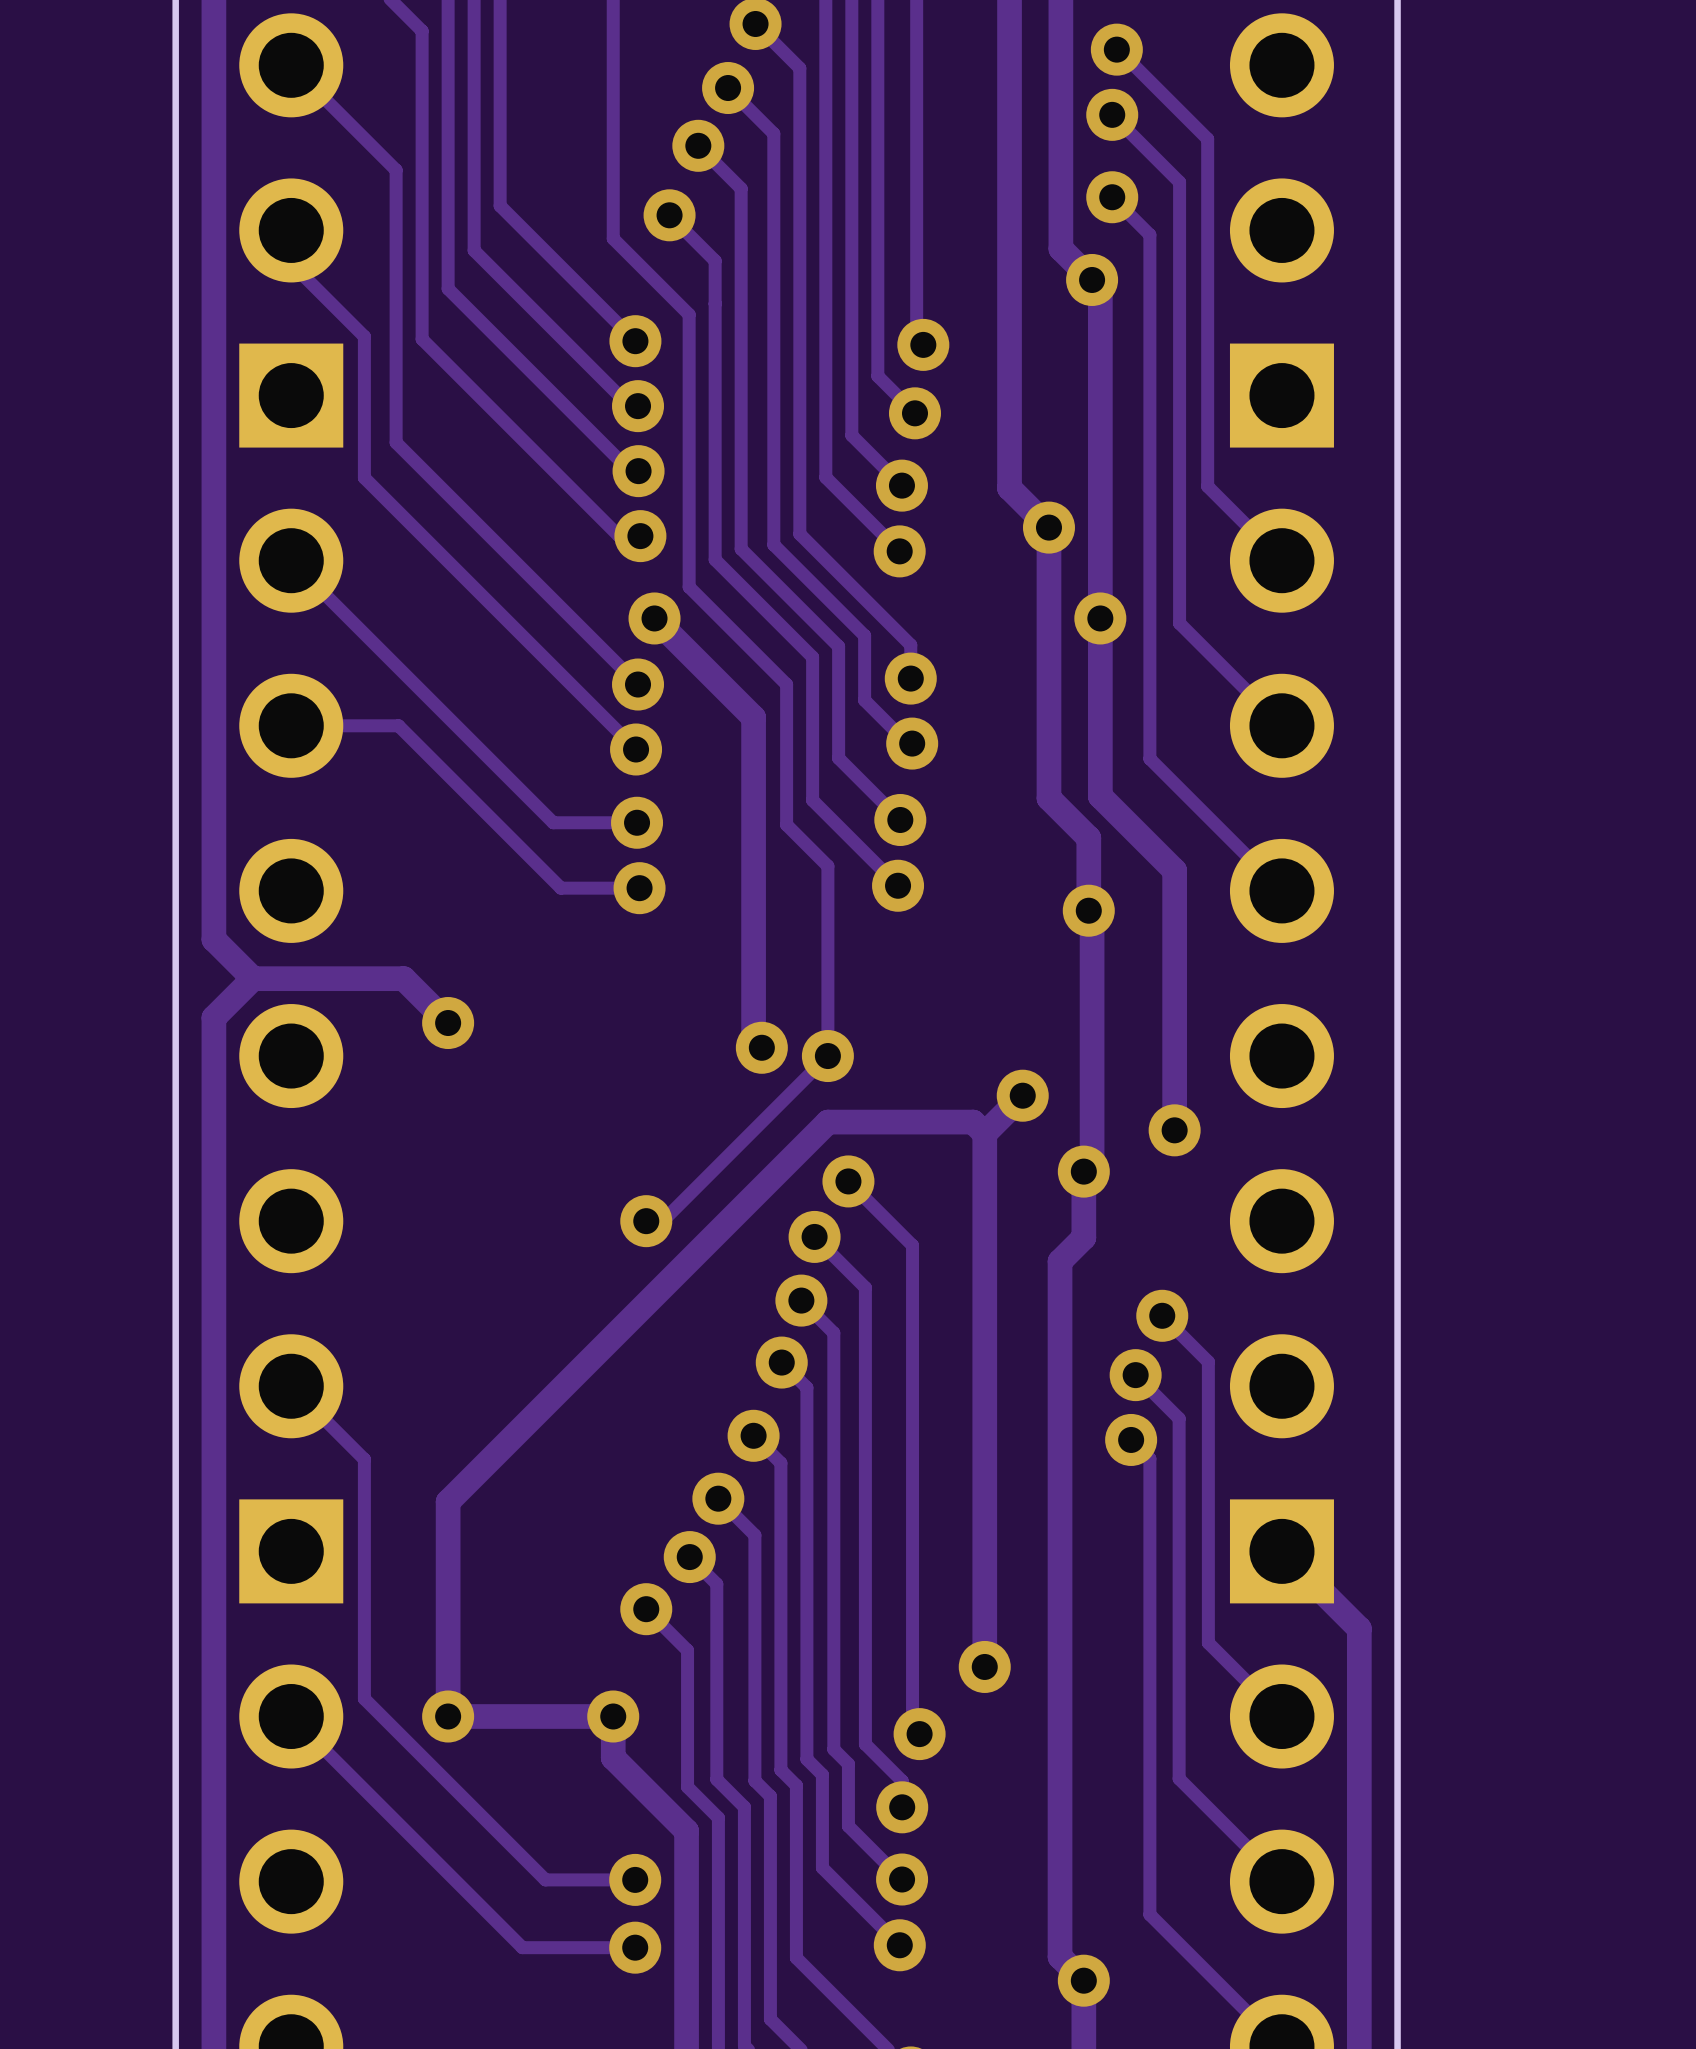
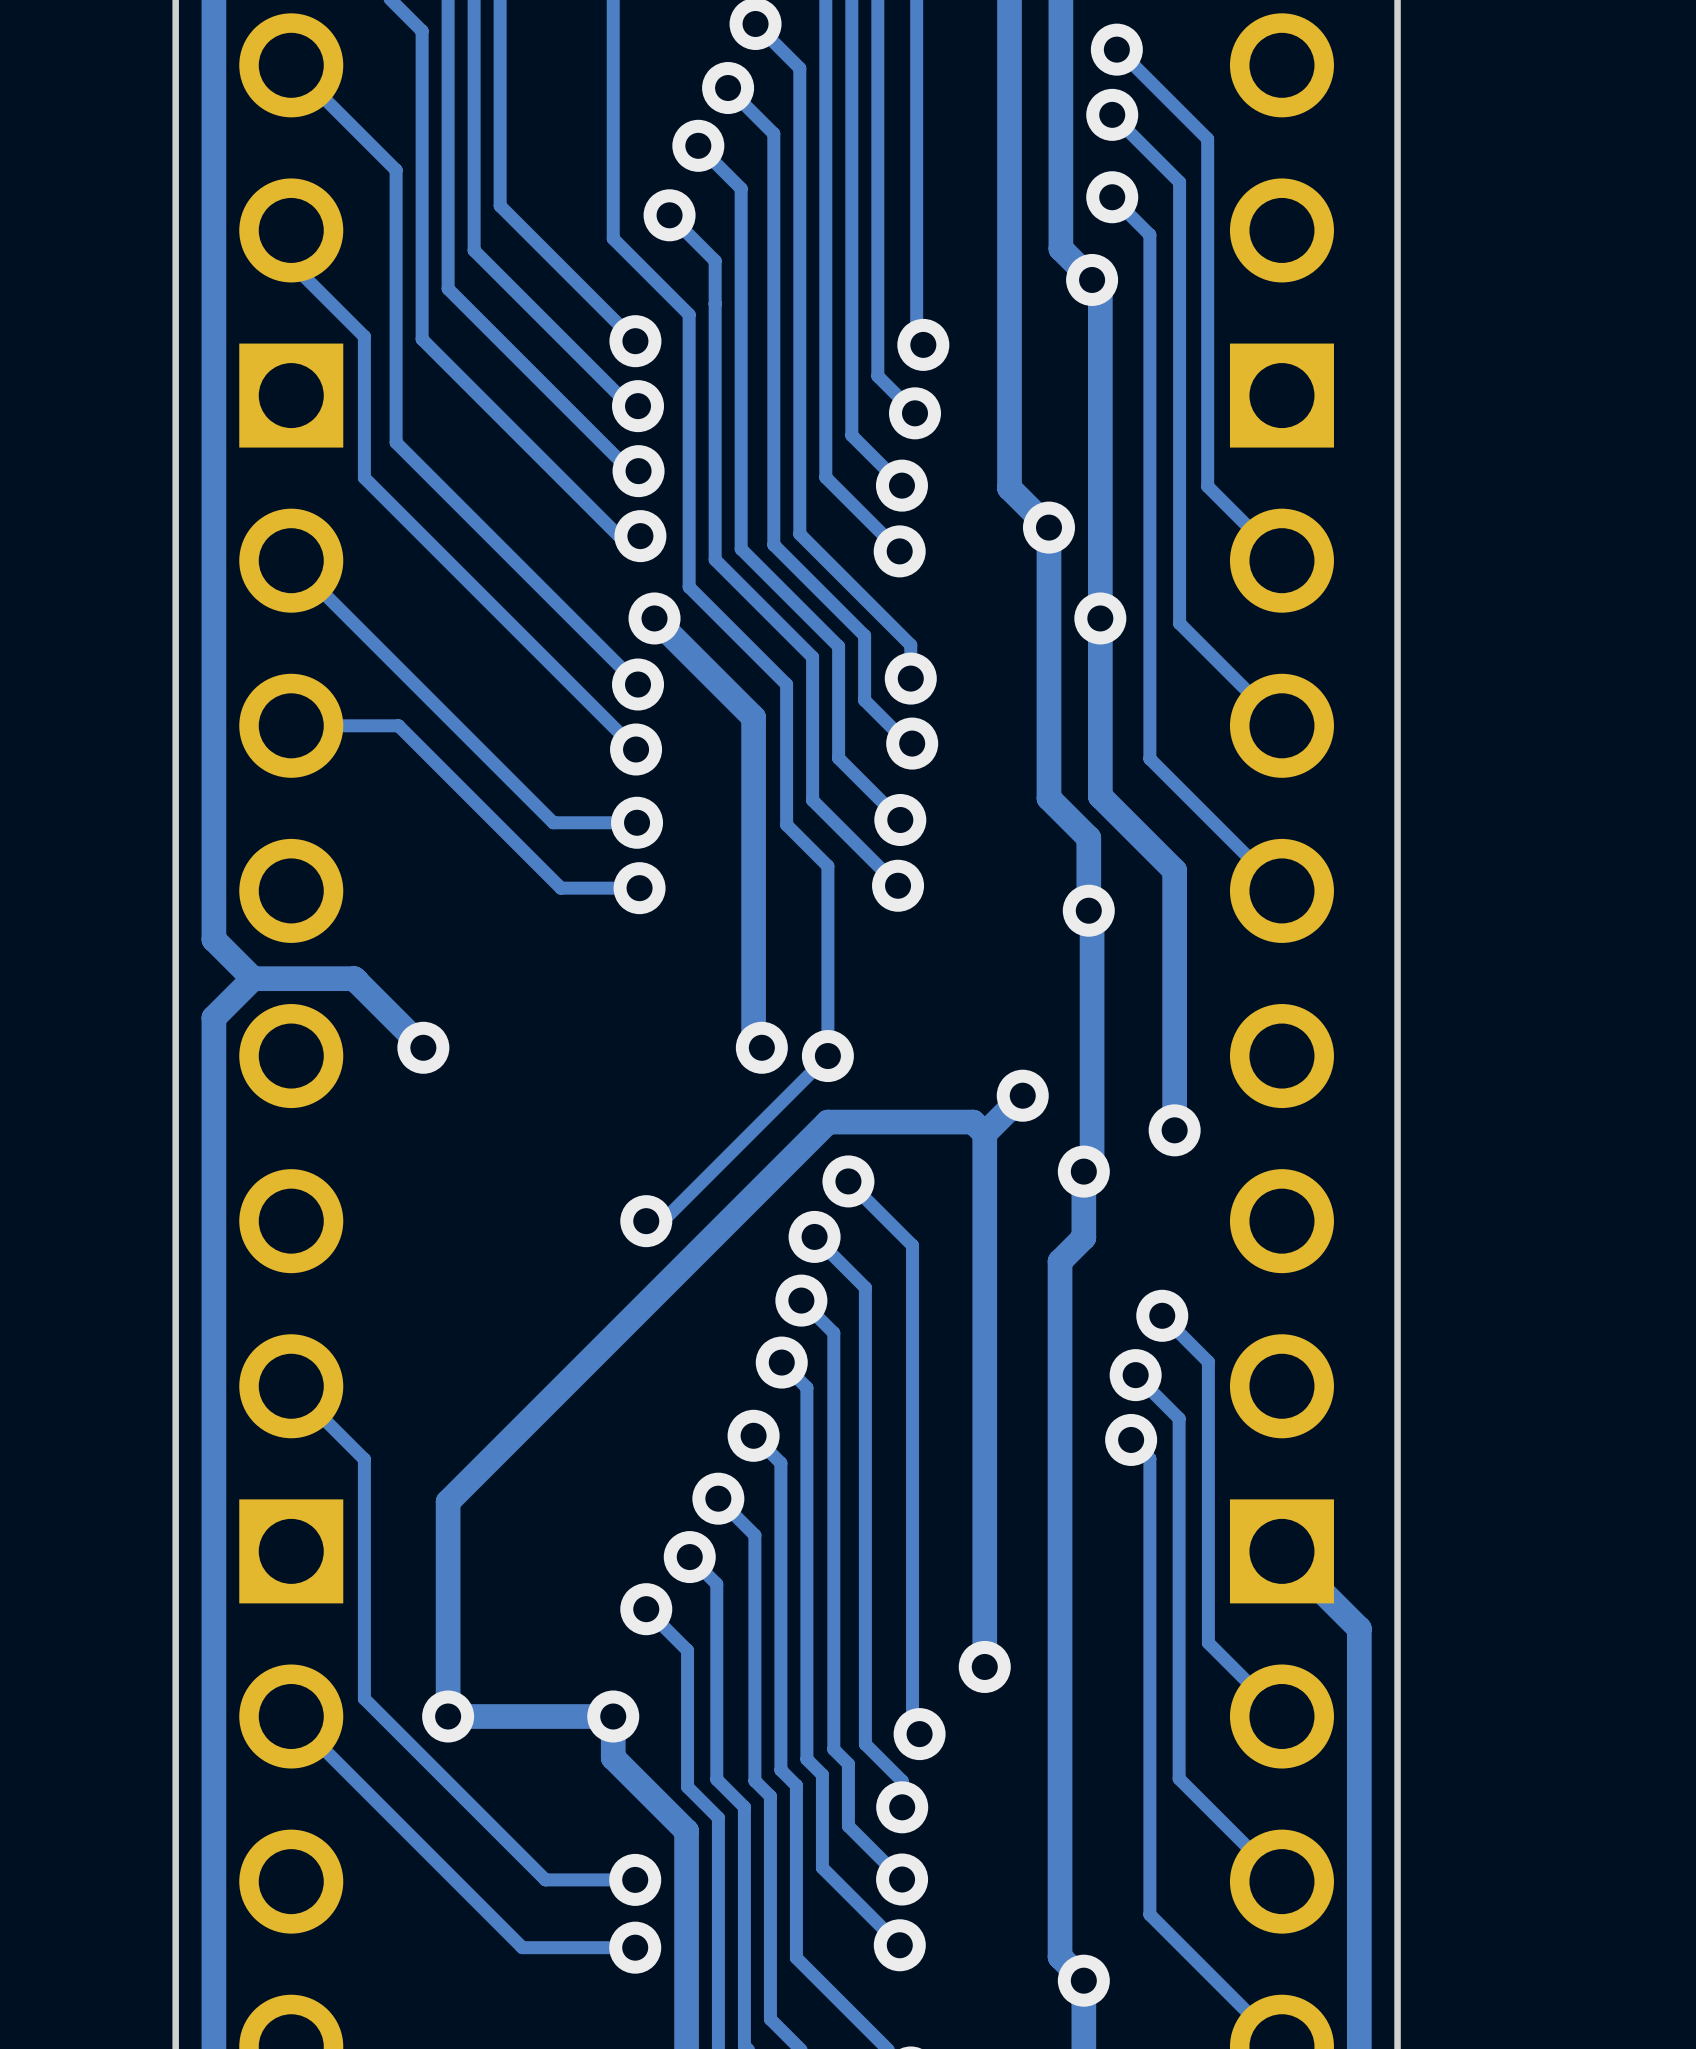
track: (354, 978) (403, 978) (448, 1023) -> (354, 978) (423, 1047)
via position: (448, 1023) -> (423, 1047)

